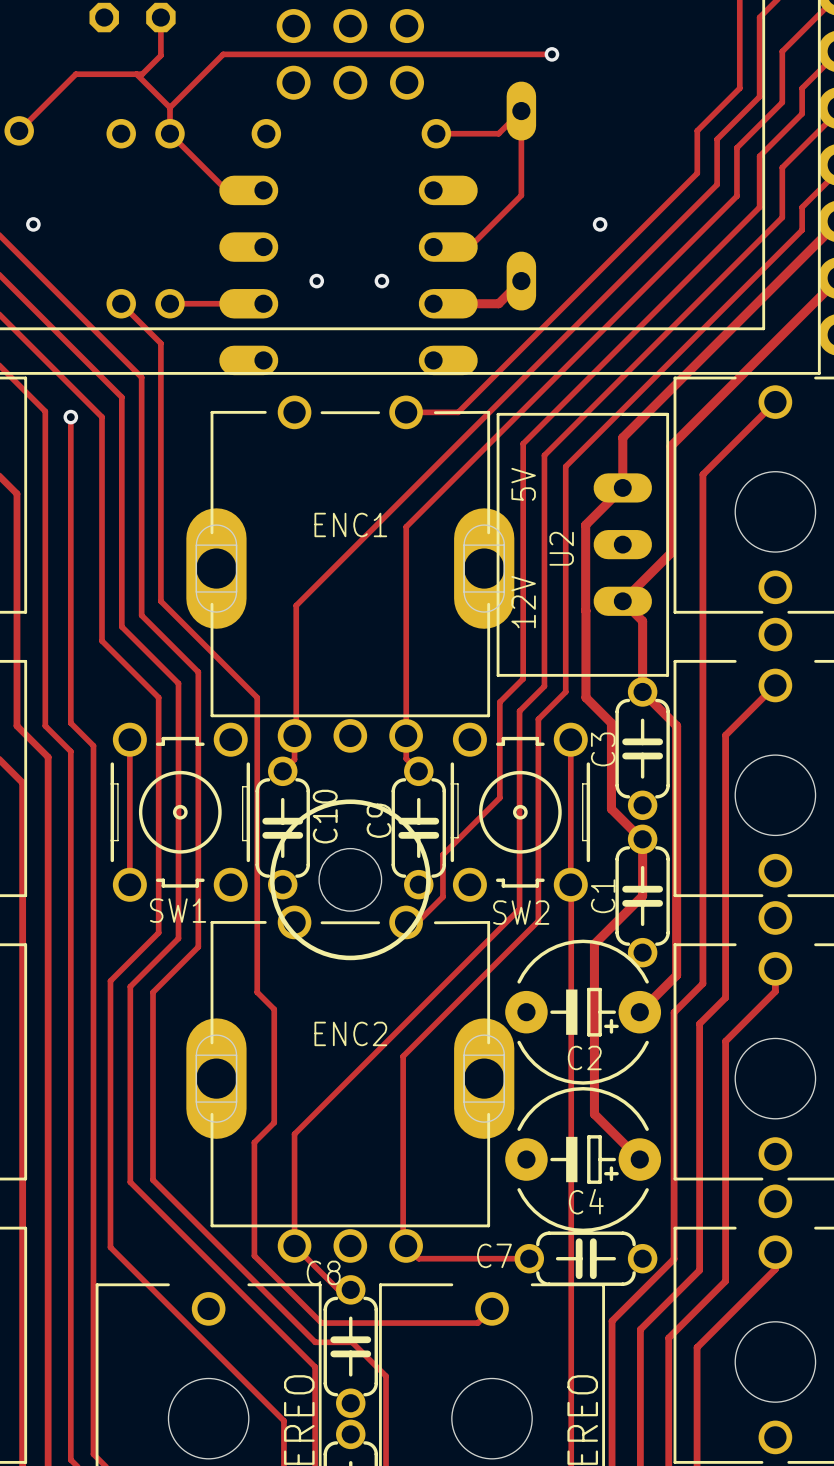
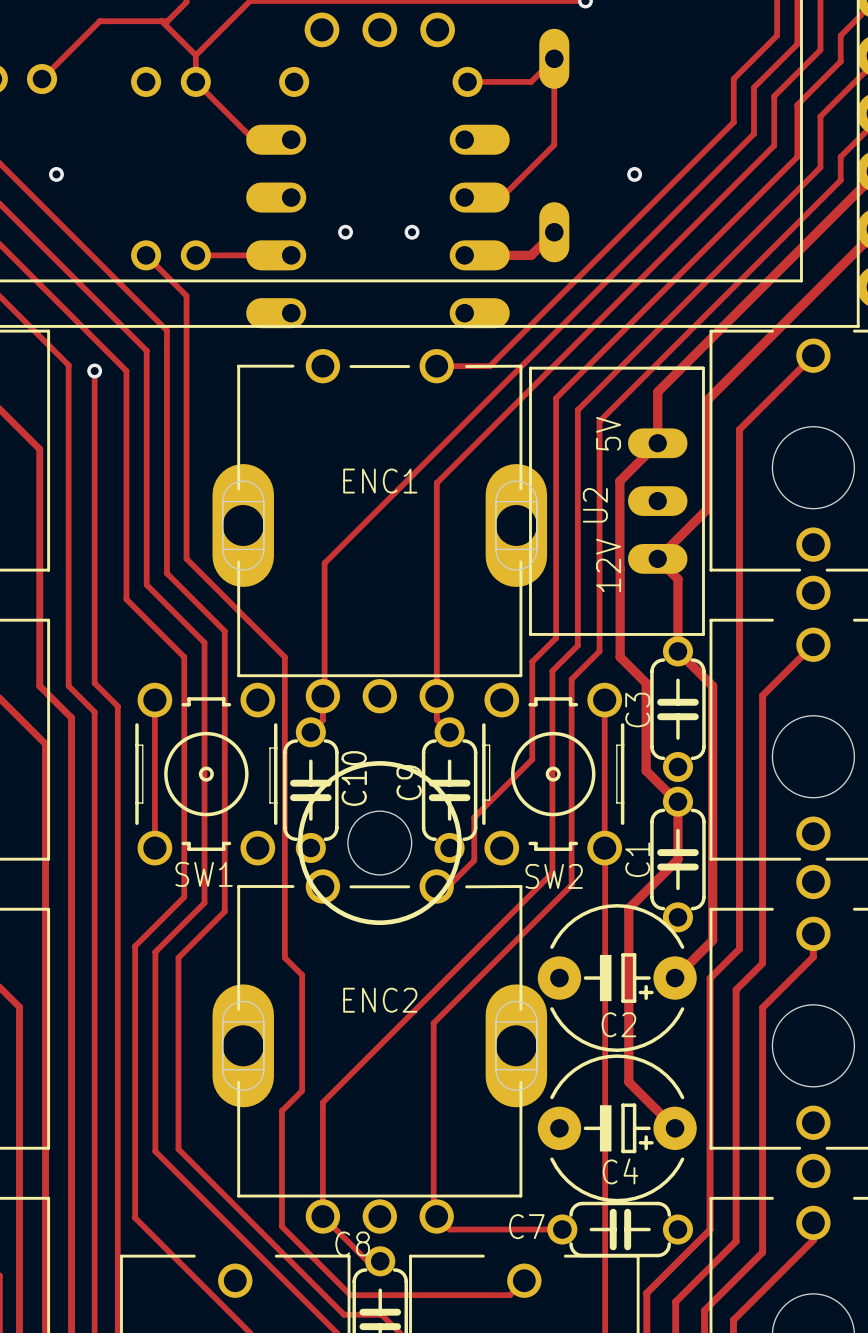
text position: 5V (523, 484) -> 5V (608, 433)
text position: 12V (523, 602) -> 12V (608, 565)

